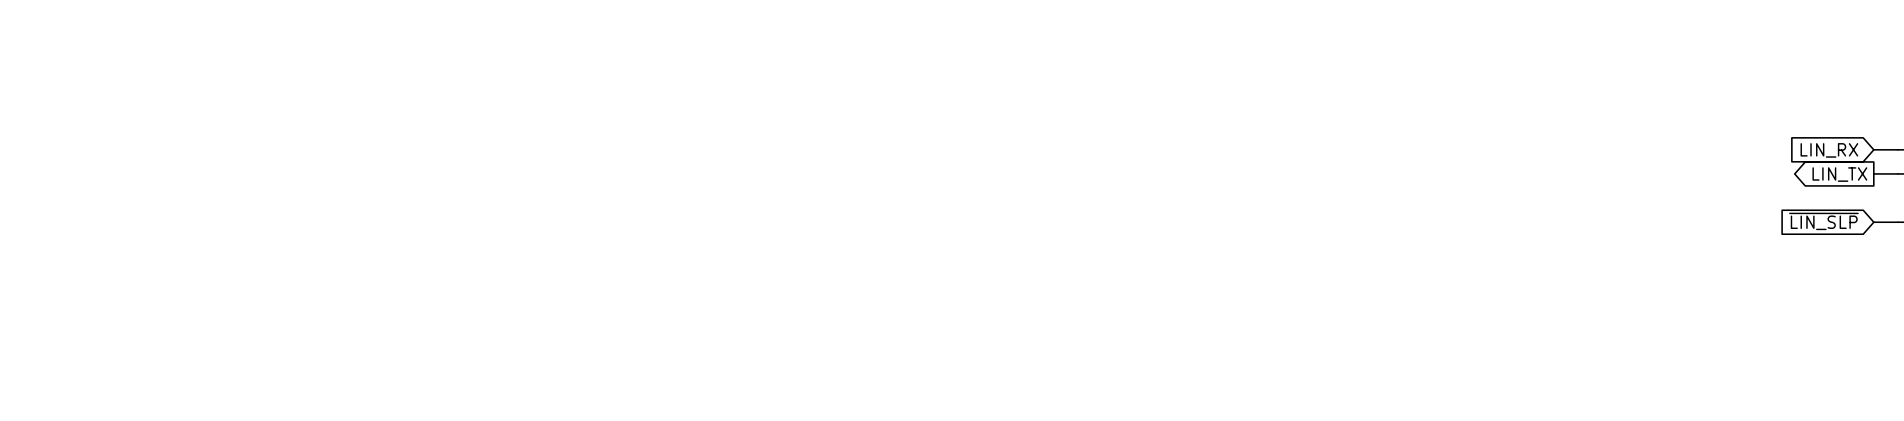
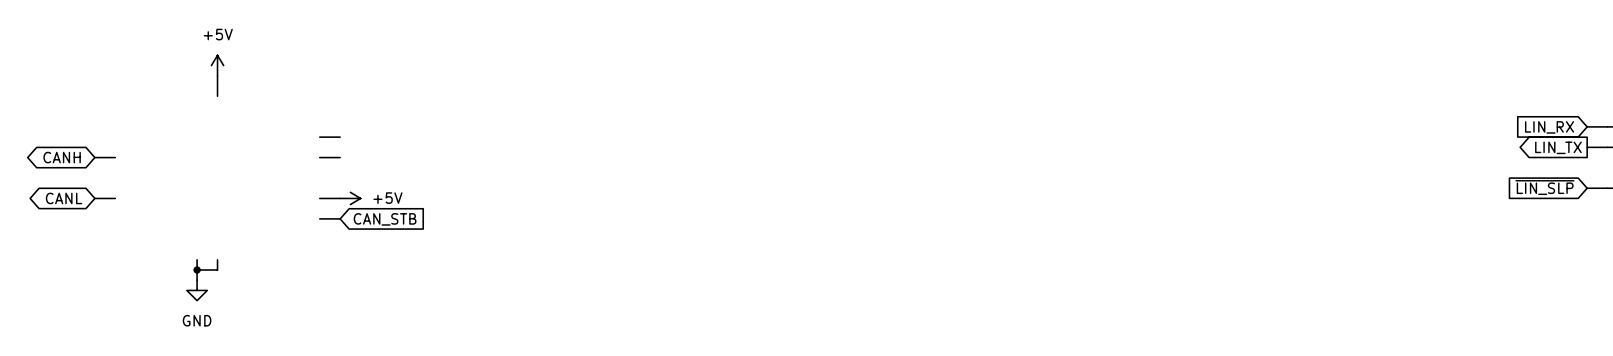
power symbol: none -> +5V (217, 65)
wire: none -> (217, 75) (217, 96)
wire: none -> (319, 137) (340, 137)
global label: none -> CANH (62, 157)
wire: none -> (94, 157) (115, 157)
wire: none -> (319, 157) (340, 157)
global label: none -> CANL (64, 198)
wire: none -> (94, 198) (115, 198)
wire: none -> (319, 198) (340, 198)
power symbol: none -> +5V (350, 198)
wire: none -> (319, 218) (340, 218)
global label: none -> CAN_STB (385, 219)
wire: none -> (197, 259) (197, 280)
wire: none -> (217, 259) (217, 270) (197, 270)
junction: none -> (197, 270)
power symbol: none -> GND (197, 290)

